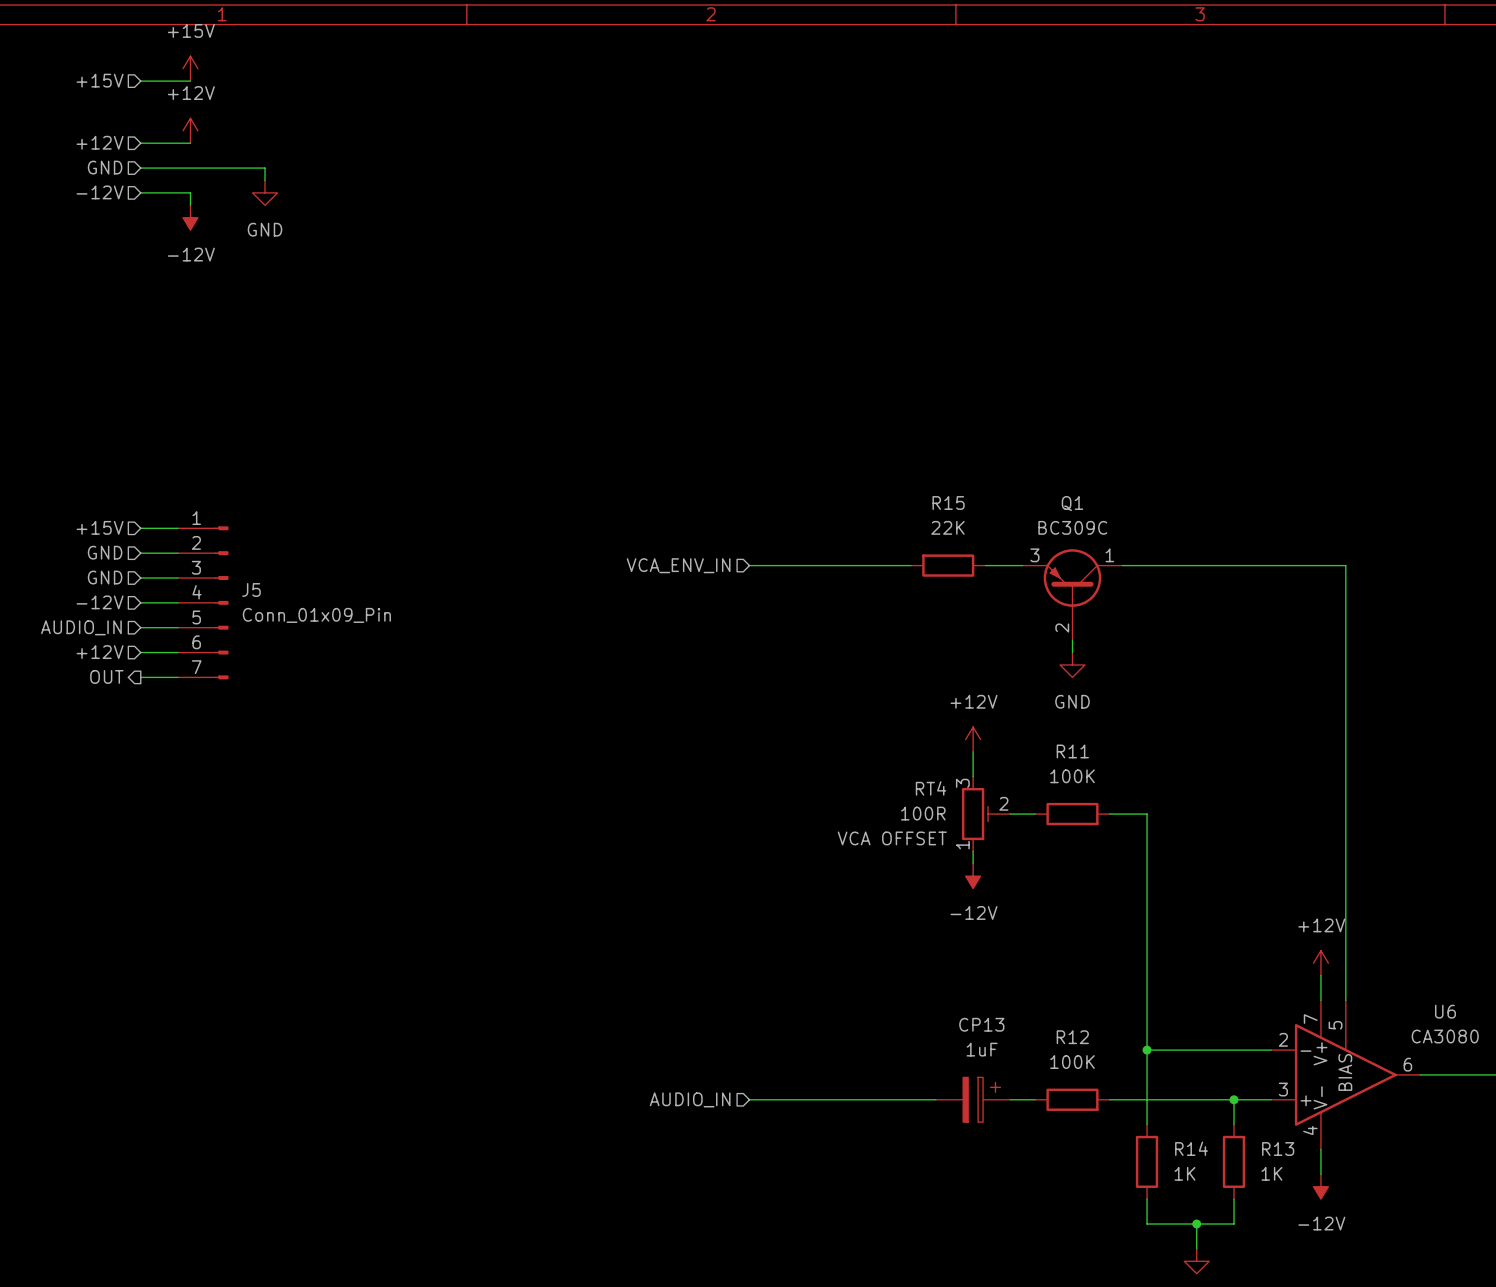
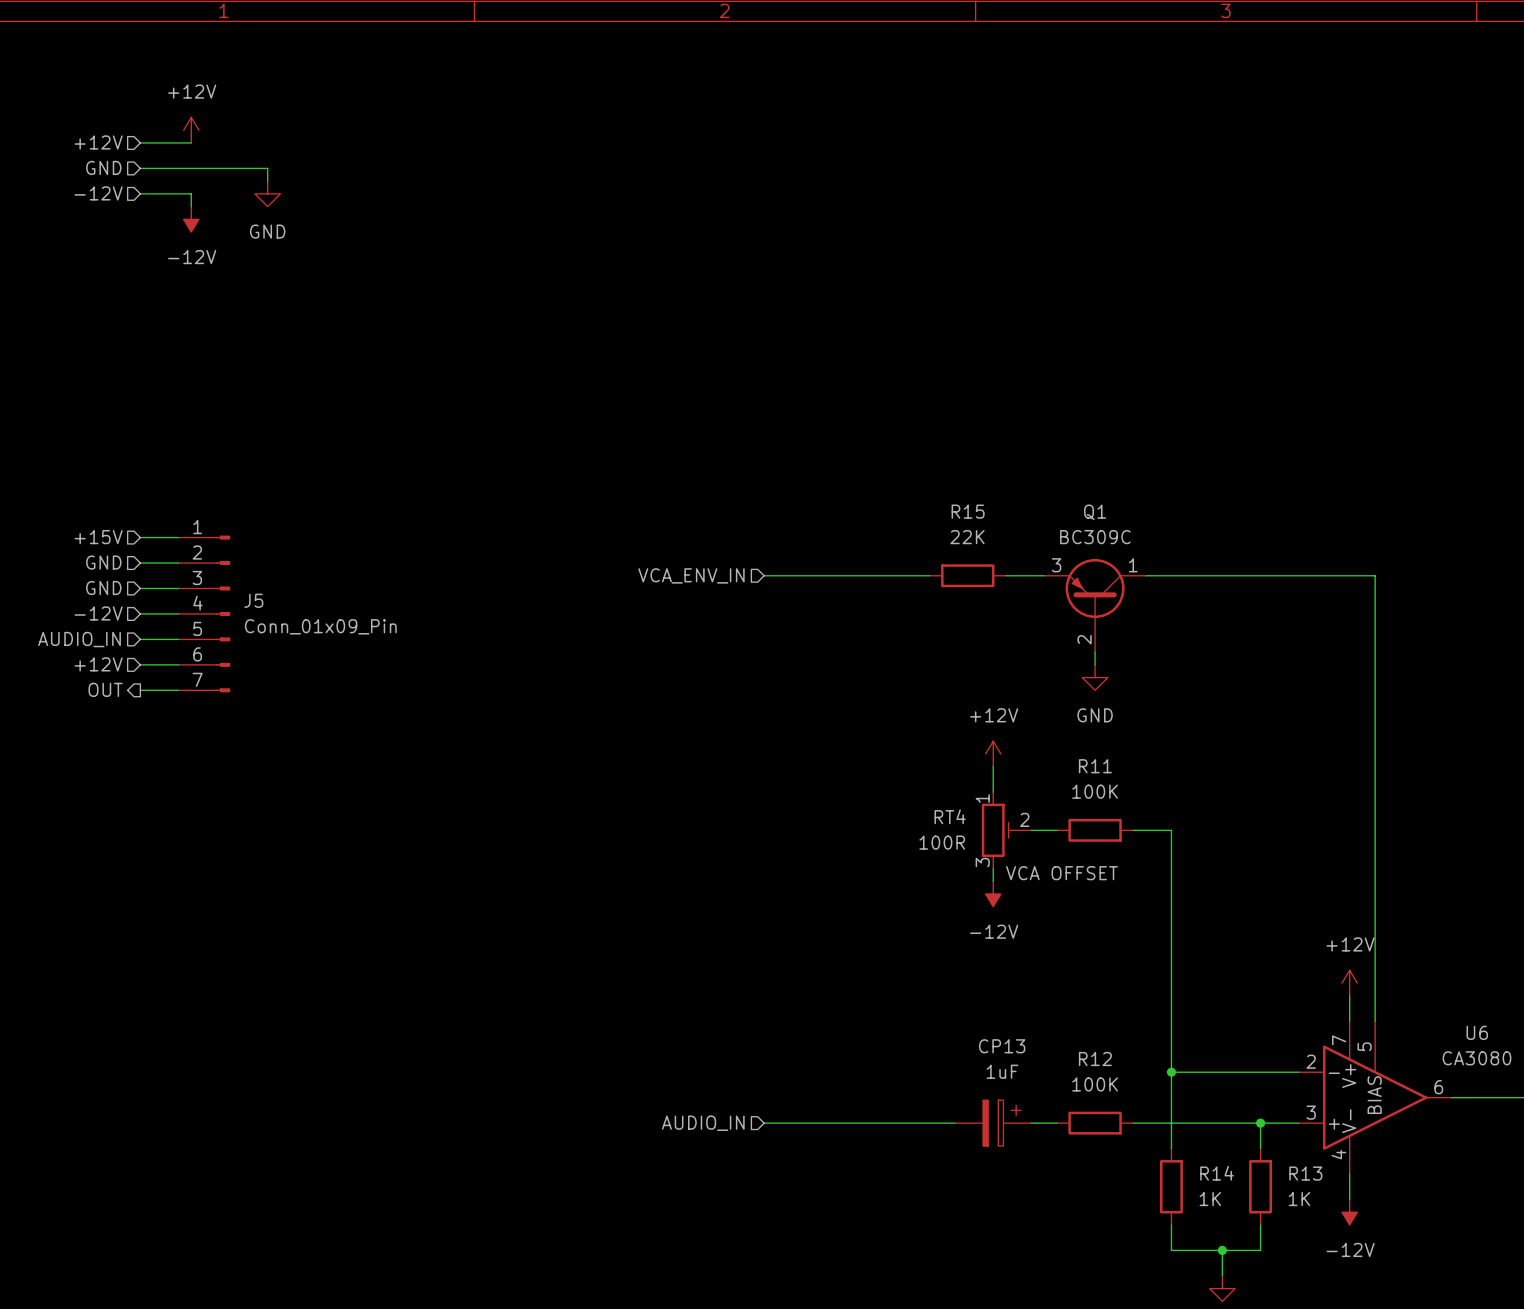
power symbol: +15V (190, 68) -> none
hierarchical label: +15V (100, 80) -> none
wire: (140, 81) (190, 81) -> none
RT4 flip: as is (979, 814) -> up-down (1000, 830)
RT4 text position: VCA OFFSET (892, 838) -> VCA OFFSET (1061, 873)

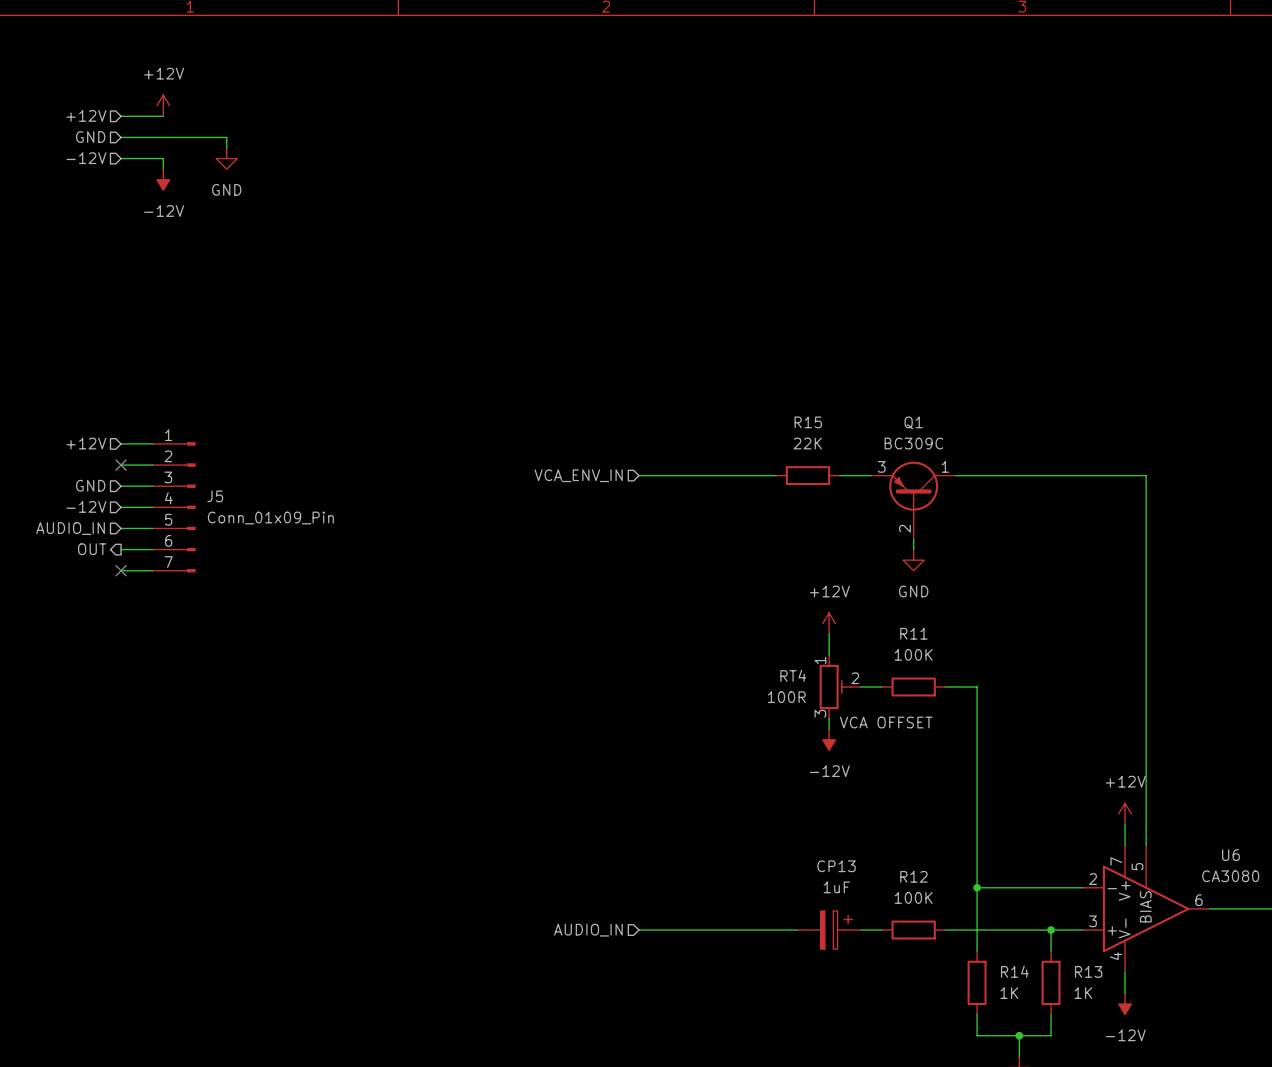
hierarchical label: +15V (98, 537) -> +12V (86, 443)
hierarchical label: GND (103, 562) -> none
no-connect mark: none -> (121, 465)
hierarchical label shape: input (98, 664) -> output (92, 549)
hierarchical label: +12V (98, 664) -> OUT (92, 549)
hierarchical label: OUT (105, 689) -> none
no-connect mark: none -> (121, 570)

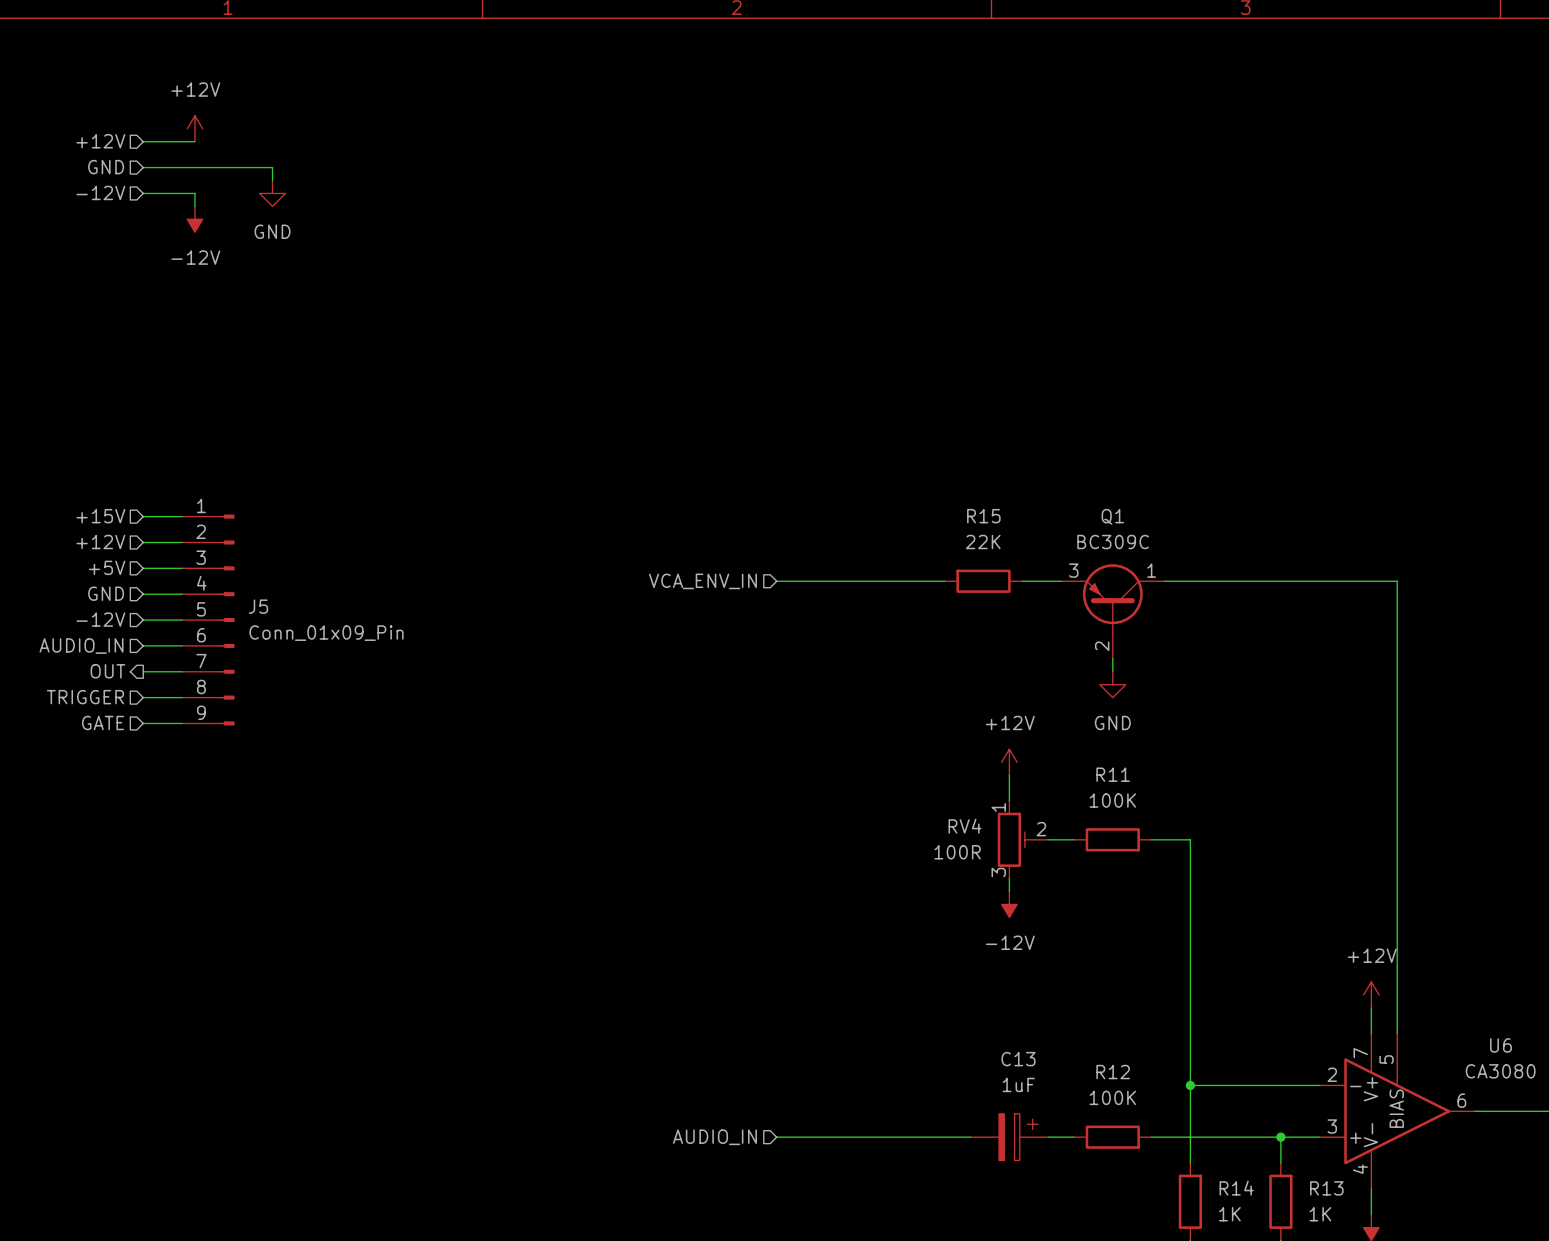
hierarchical label: none -> +15V (100, 516)
wire: none -> (143, 516) (182, 516)
J5 symbol: [152, 442, 196, 573] -> [182, 514, 235, 726]
hierarchical label: none -> +5V (107, 567)
no-connect mark: (121, 465) -> none
hierarchical label: none -> TRIGGER (85, 697)
no-connect mark: (121, 570) -> none
hierarchical label: none -> GATE (103, 722)
wire: none -> (143, 723) (182, 723)
RT4 name: RT4 (793, 675) -> RV4 (964, 826)
RT4 text: VCA OFFSET (886, 722) -> none
CP13 name: CP13 (836, 866) -> C13 (1018, 1059)

